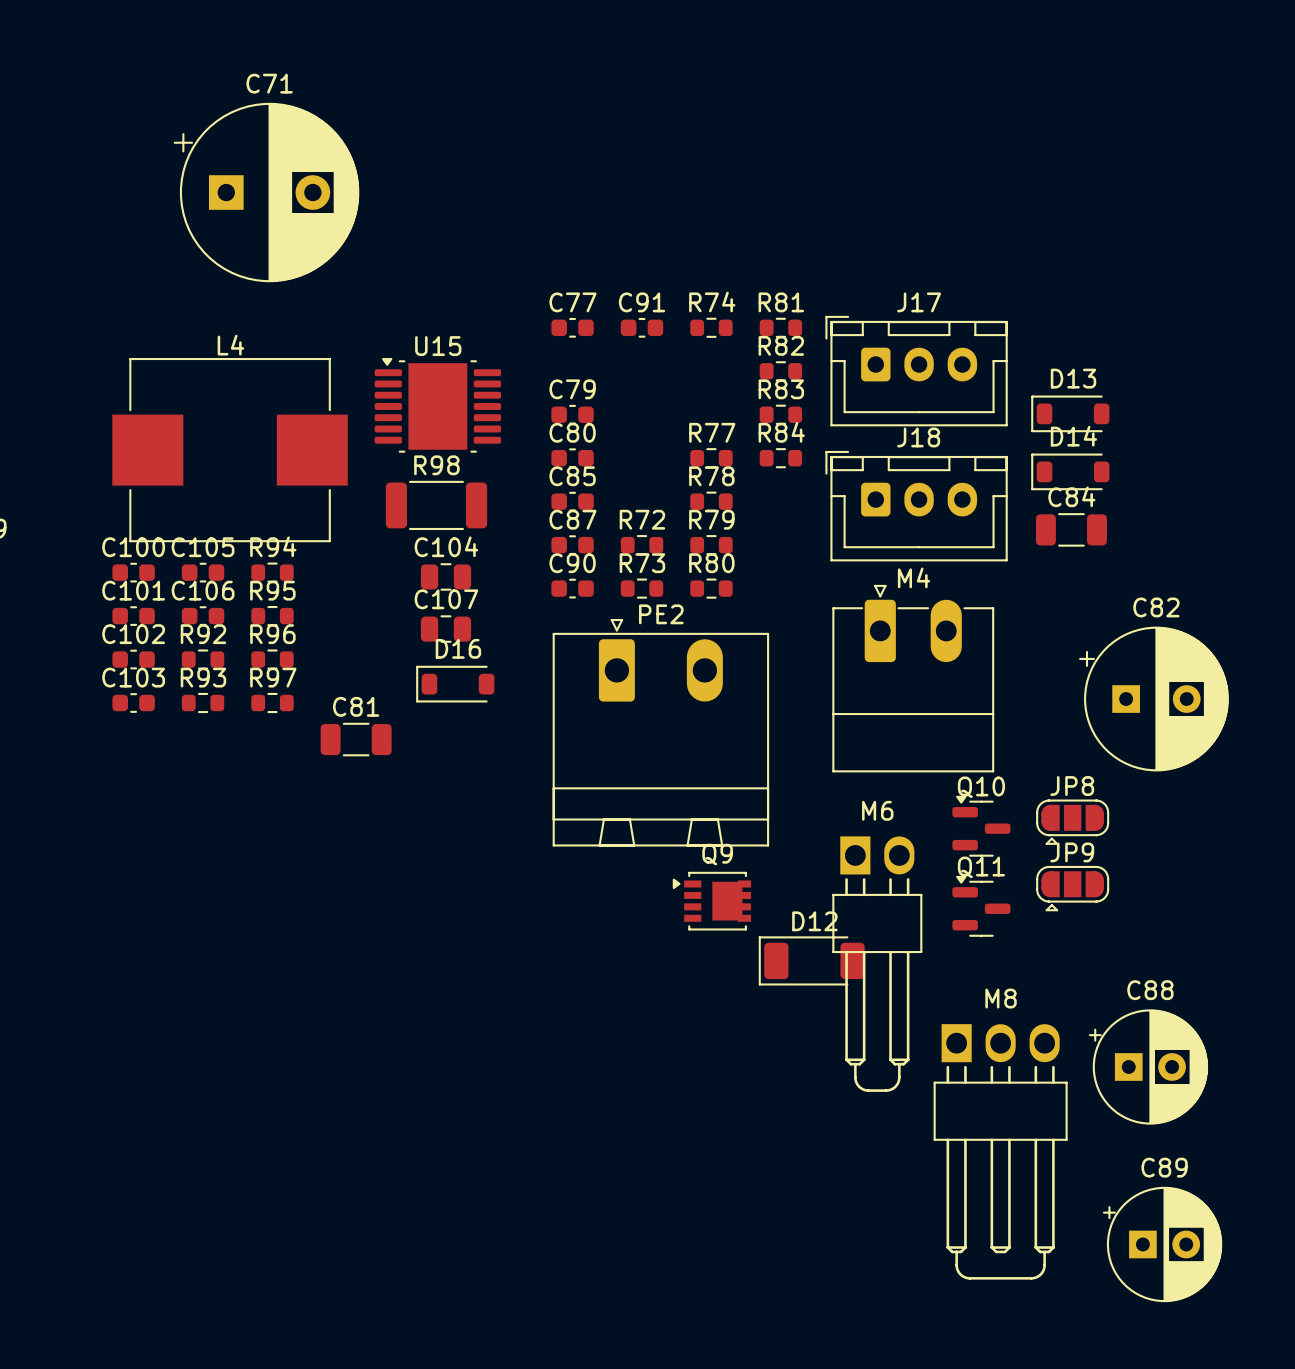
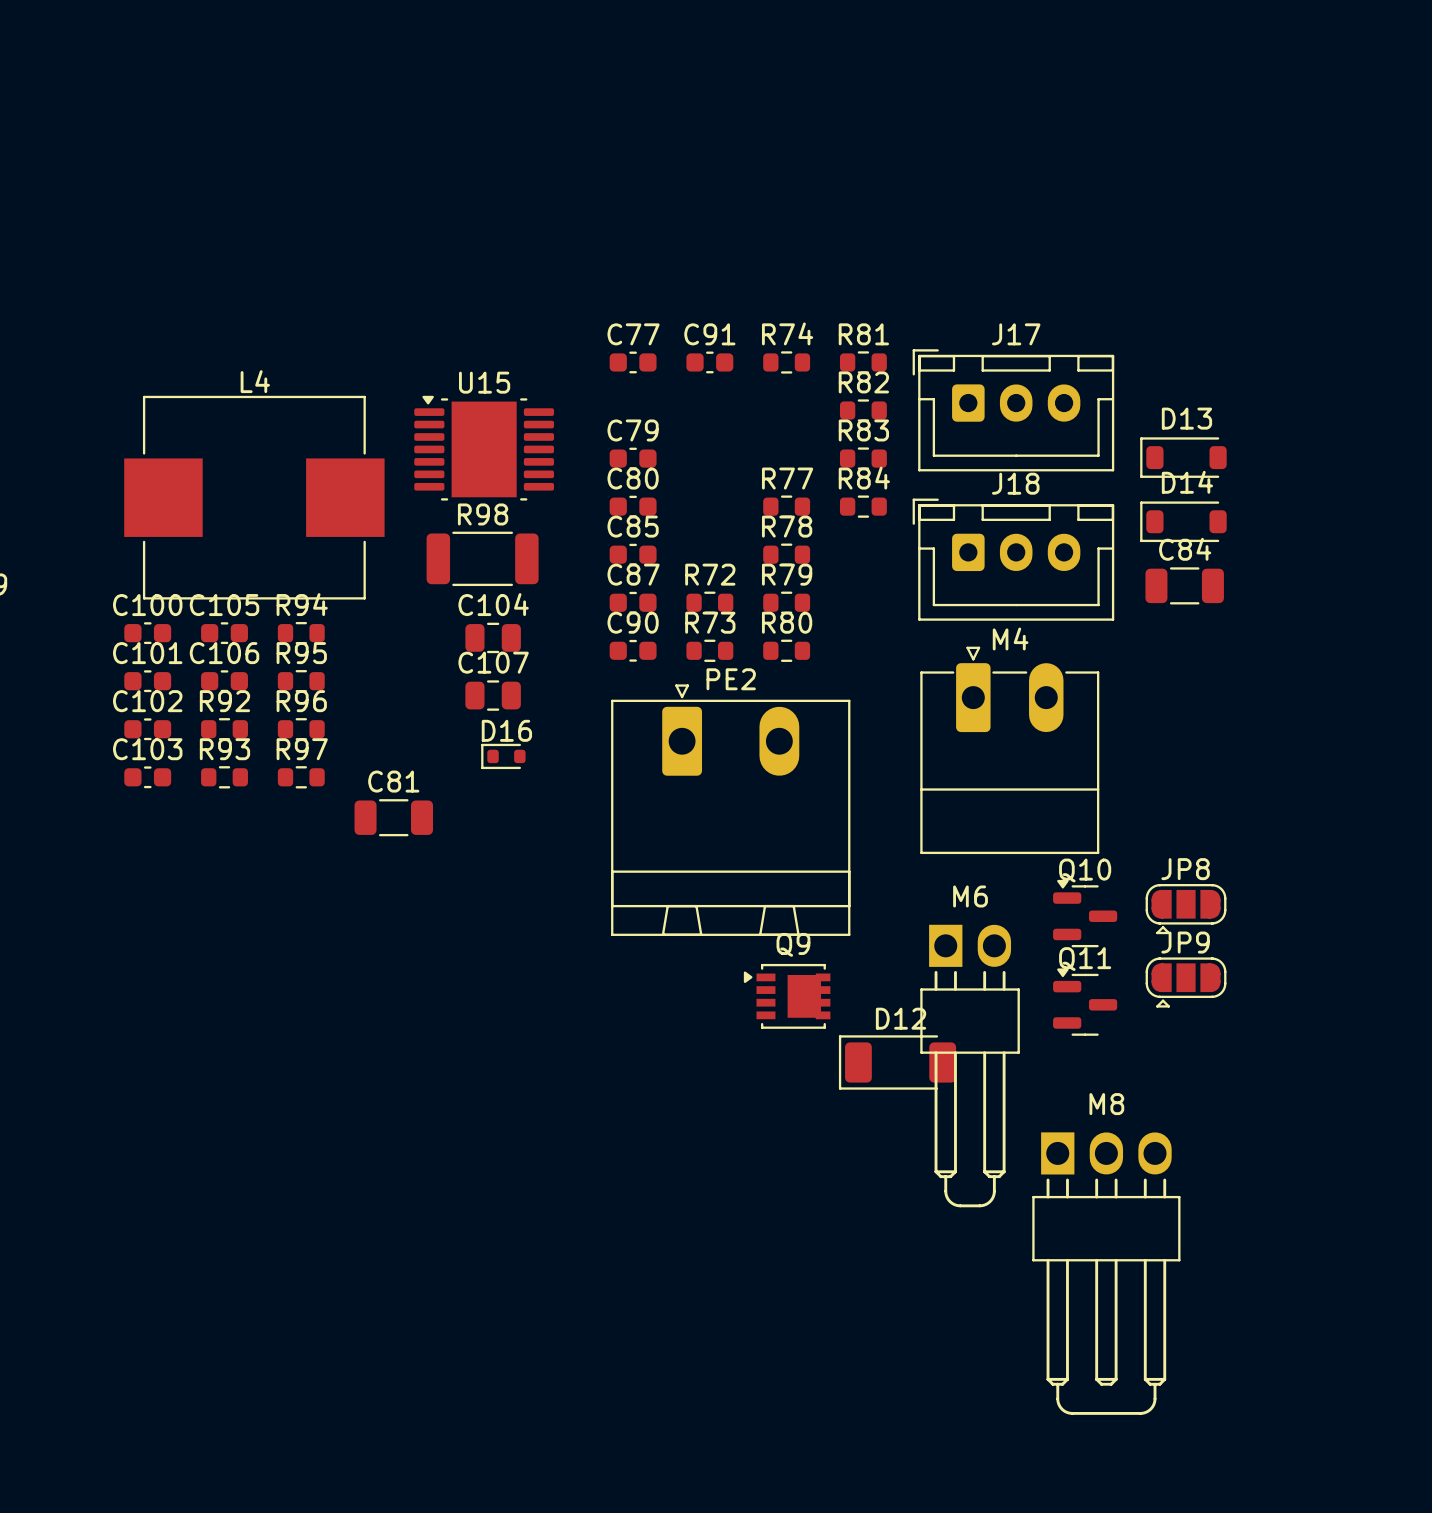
C71: (266, 192) -> none
D16 footprint: [416, 665, 495, 703] -> [481, 743, 526, 770]
C82: (1153, 699) -> none
C88: (1148, 1066) -> none
C89: (1162, 1244) -> none

